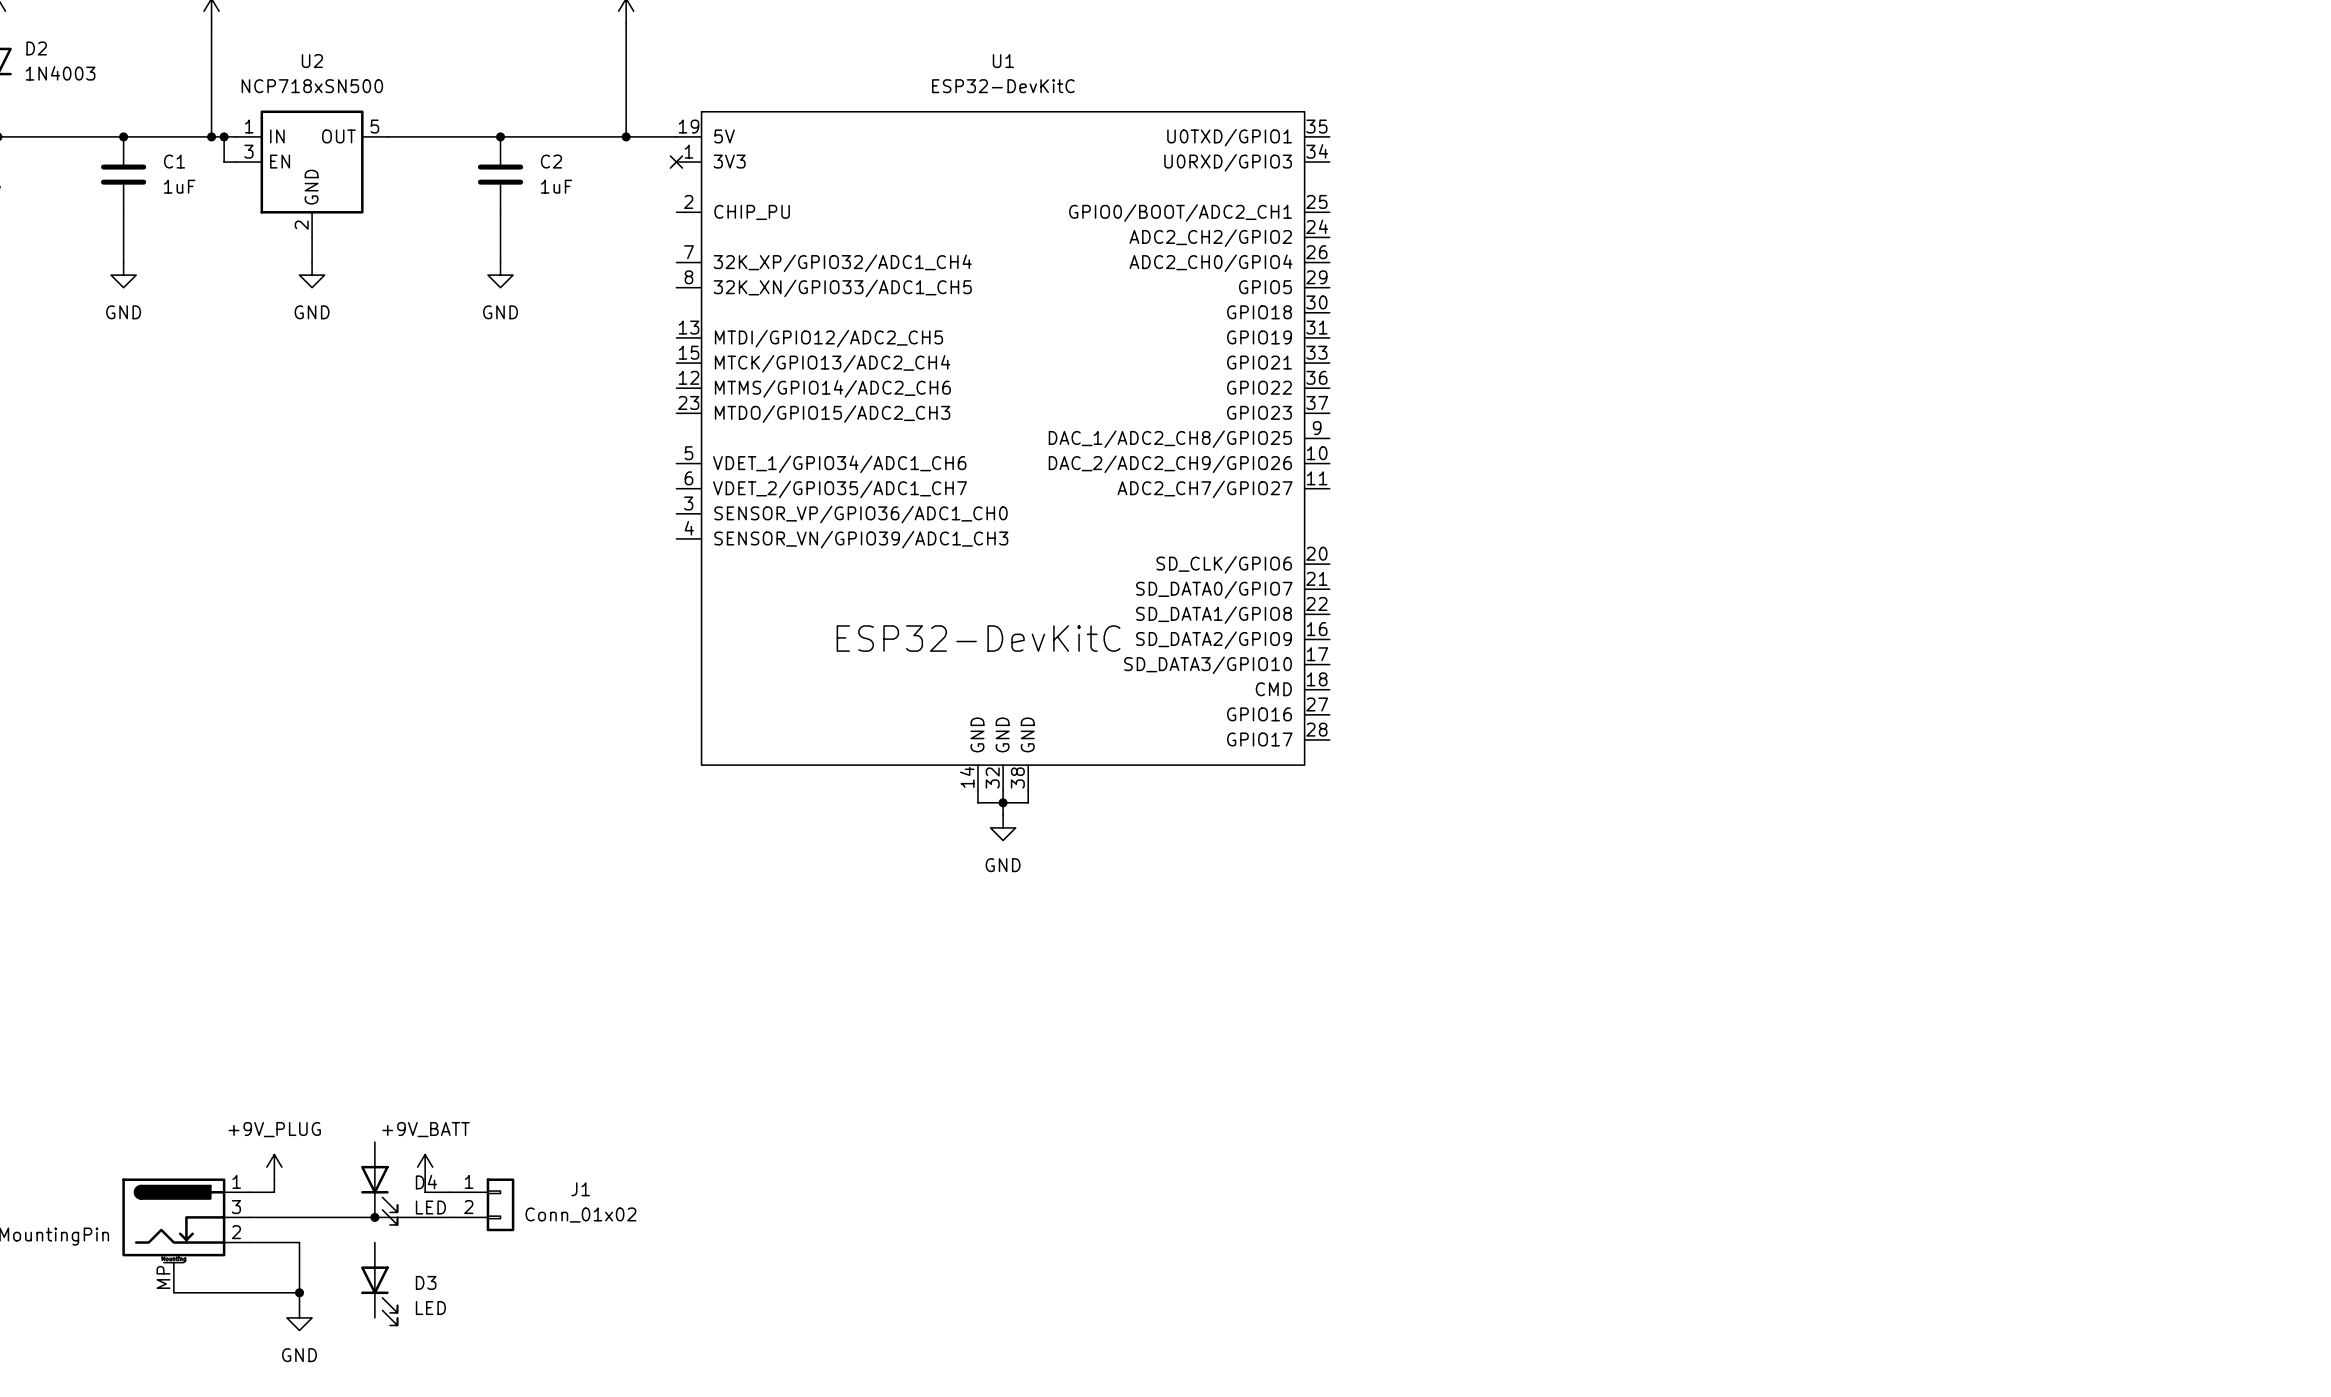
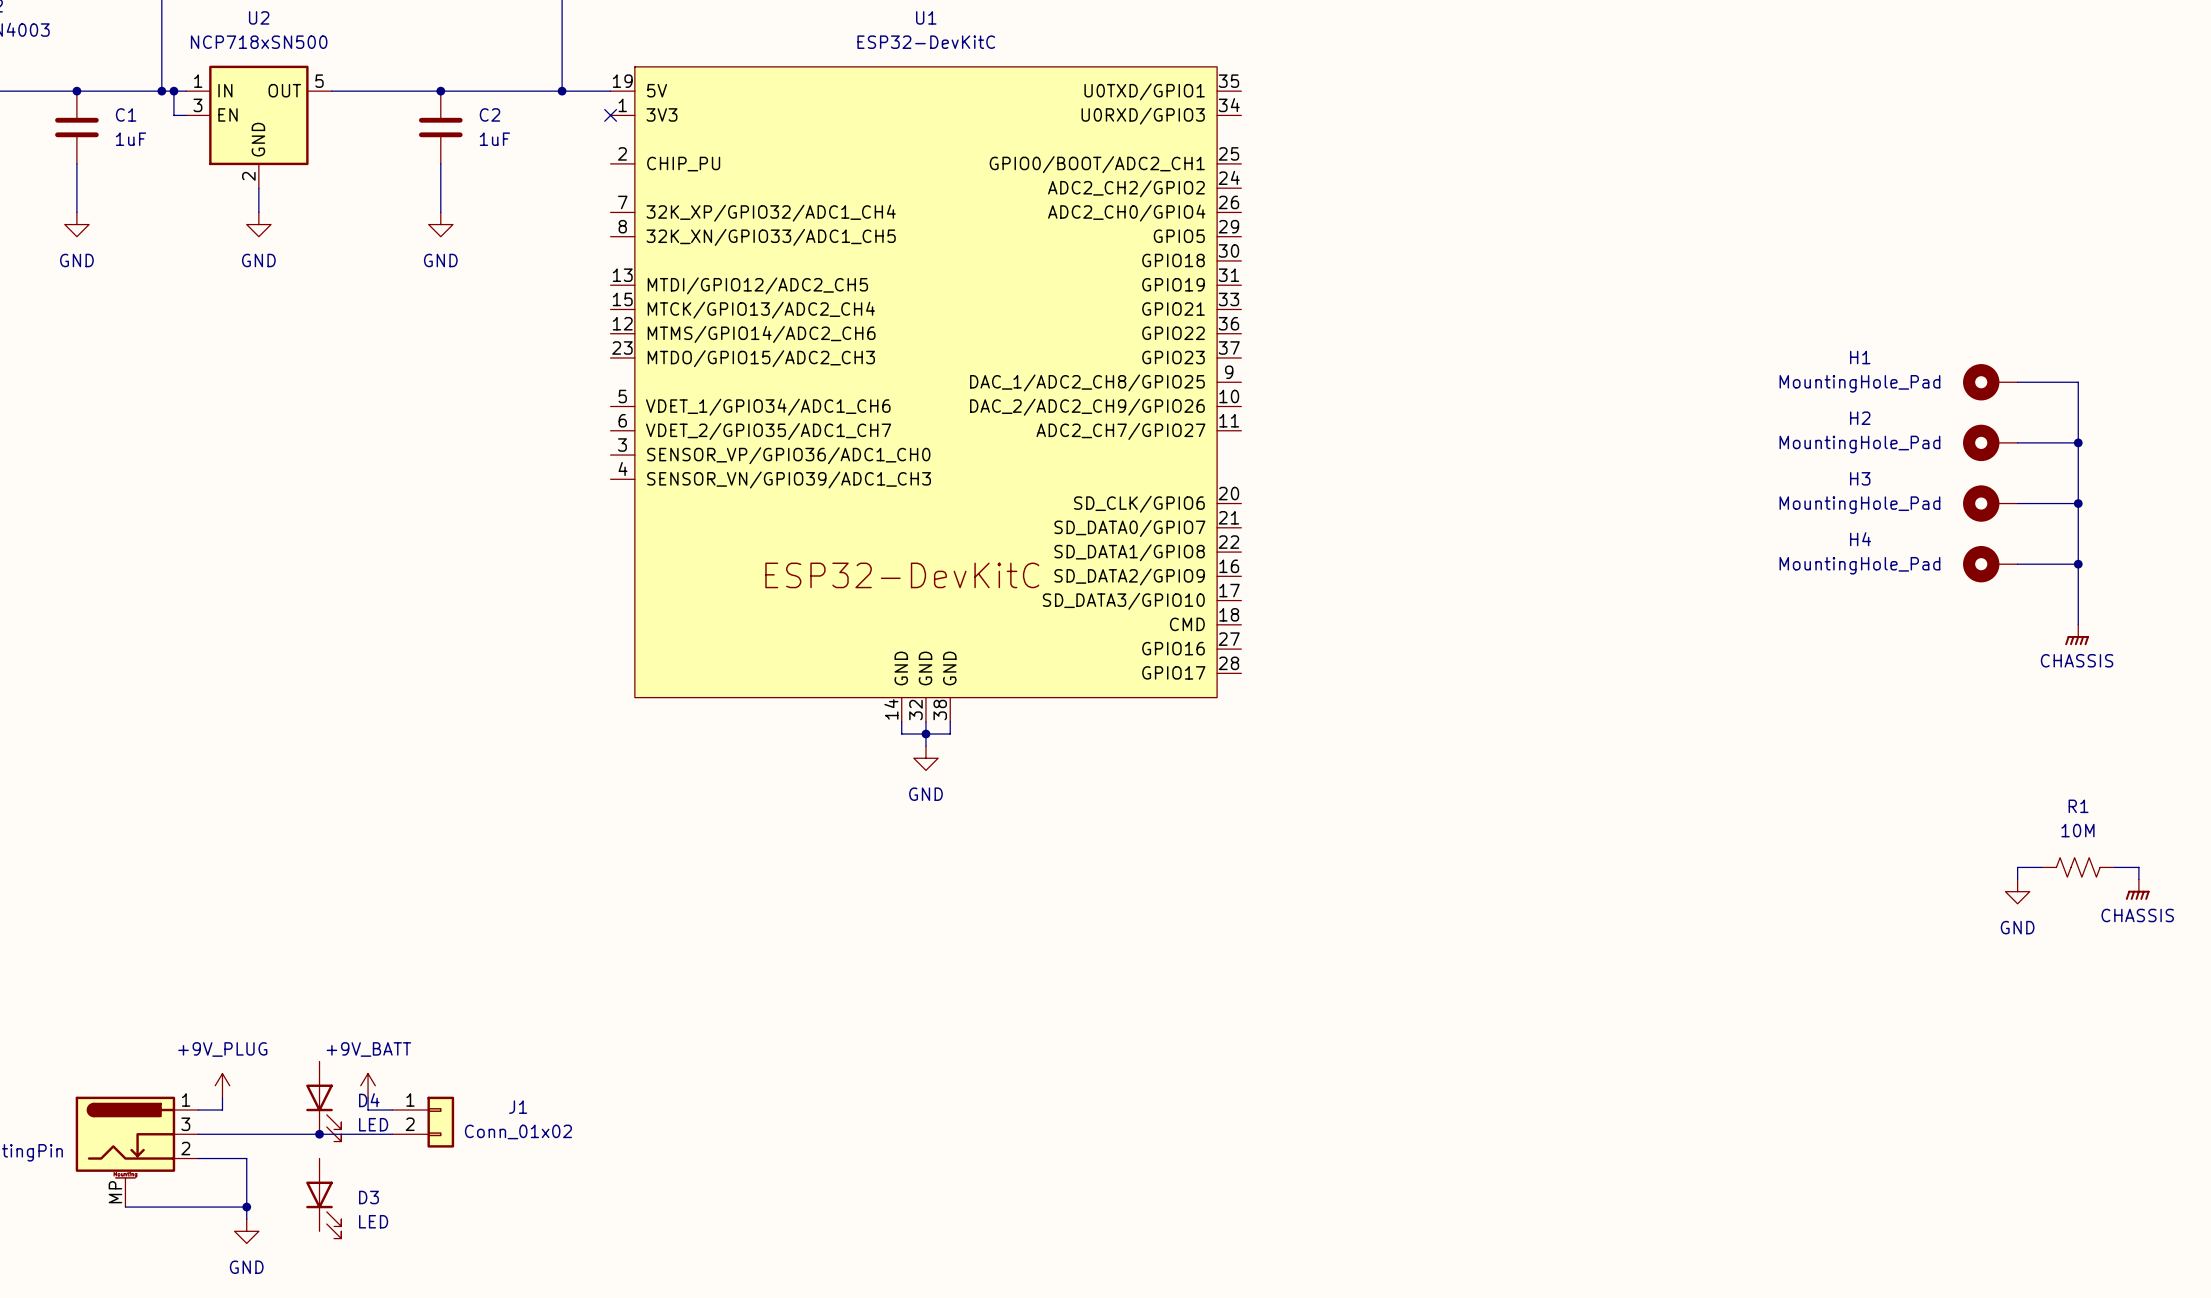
H1: none -> MountingHole_Pad (1990, 382)
wire: none -> (2017, 382) (2078, 382) (2078, 624)
H2: none -> MountingHole_Pad (1990, 442)
wire: none -> (2017, 442) (2078, 442)
junction: none -> (2078, 442)
H3: none -> MountingHole_Pad (1990, 503)
wire: none -> (2017, 503) (2078, 503)
junction: none -> (2078, 503)
H4: none -> MountingHole_Pad (1990, 564)
wire: none -> (2017, 564) (2078, 564)
junction: none -> (2078, 564)
power symbol: none -> CHASSIS (2077, 635)
wire: none -> (2041, 867) (2017, 867) (2017, 879)
R1: none -> 10M (2078, 867)
wire: none -> (2114, 867) (2138, 867) (2138, 879)
power symbol: none -> CHASSIS (2137, 889)
power symbol: none -> GND (2017, 891)

